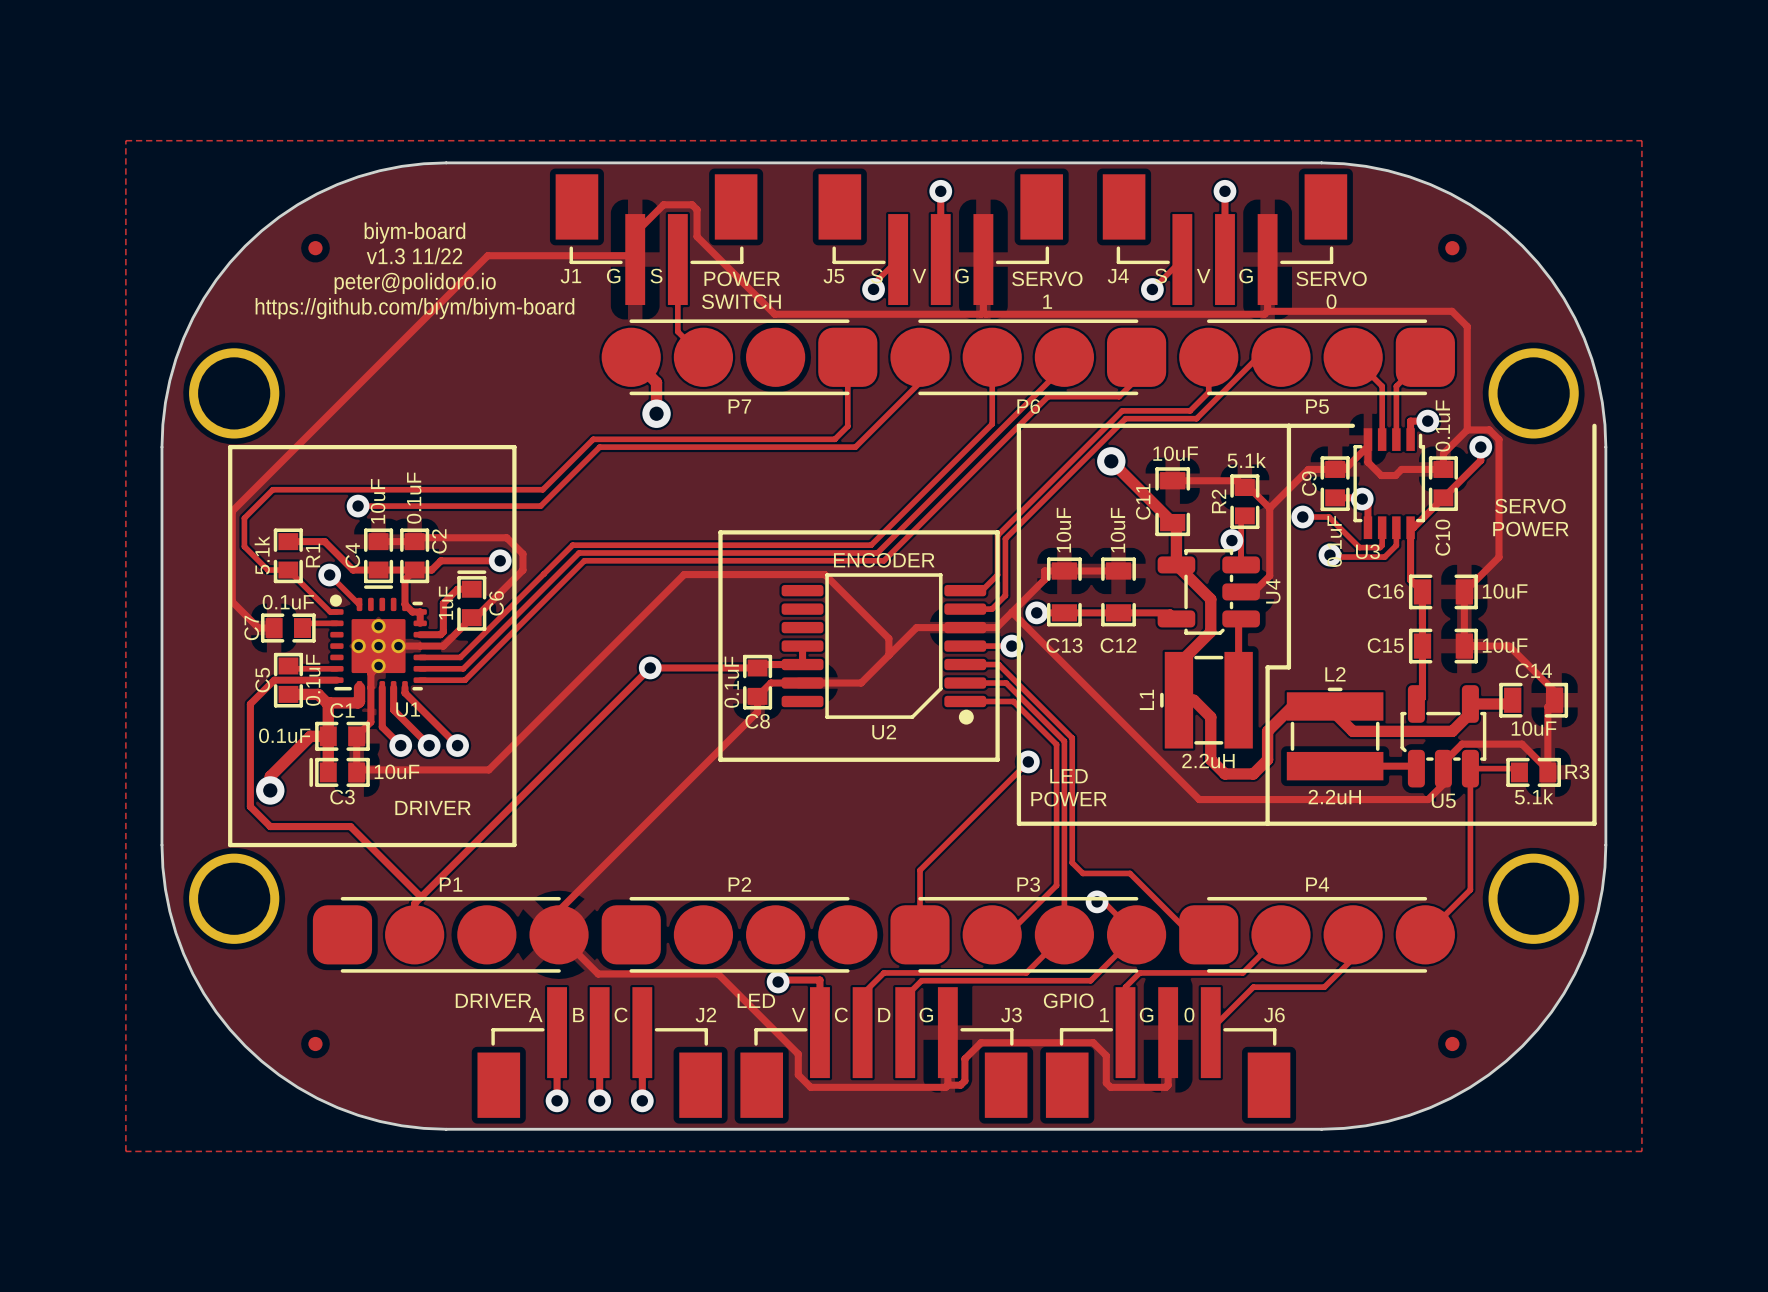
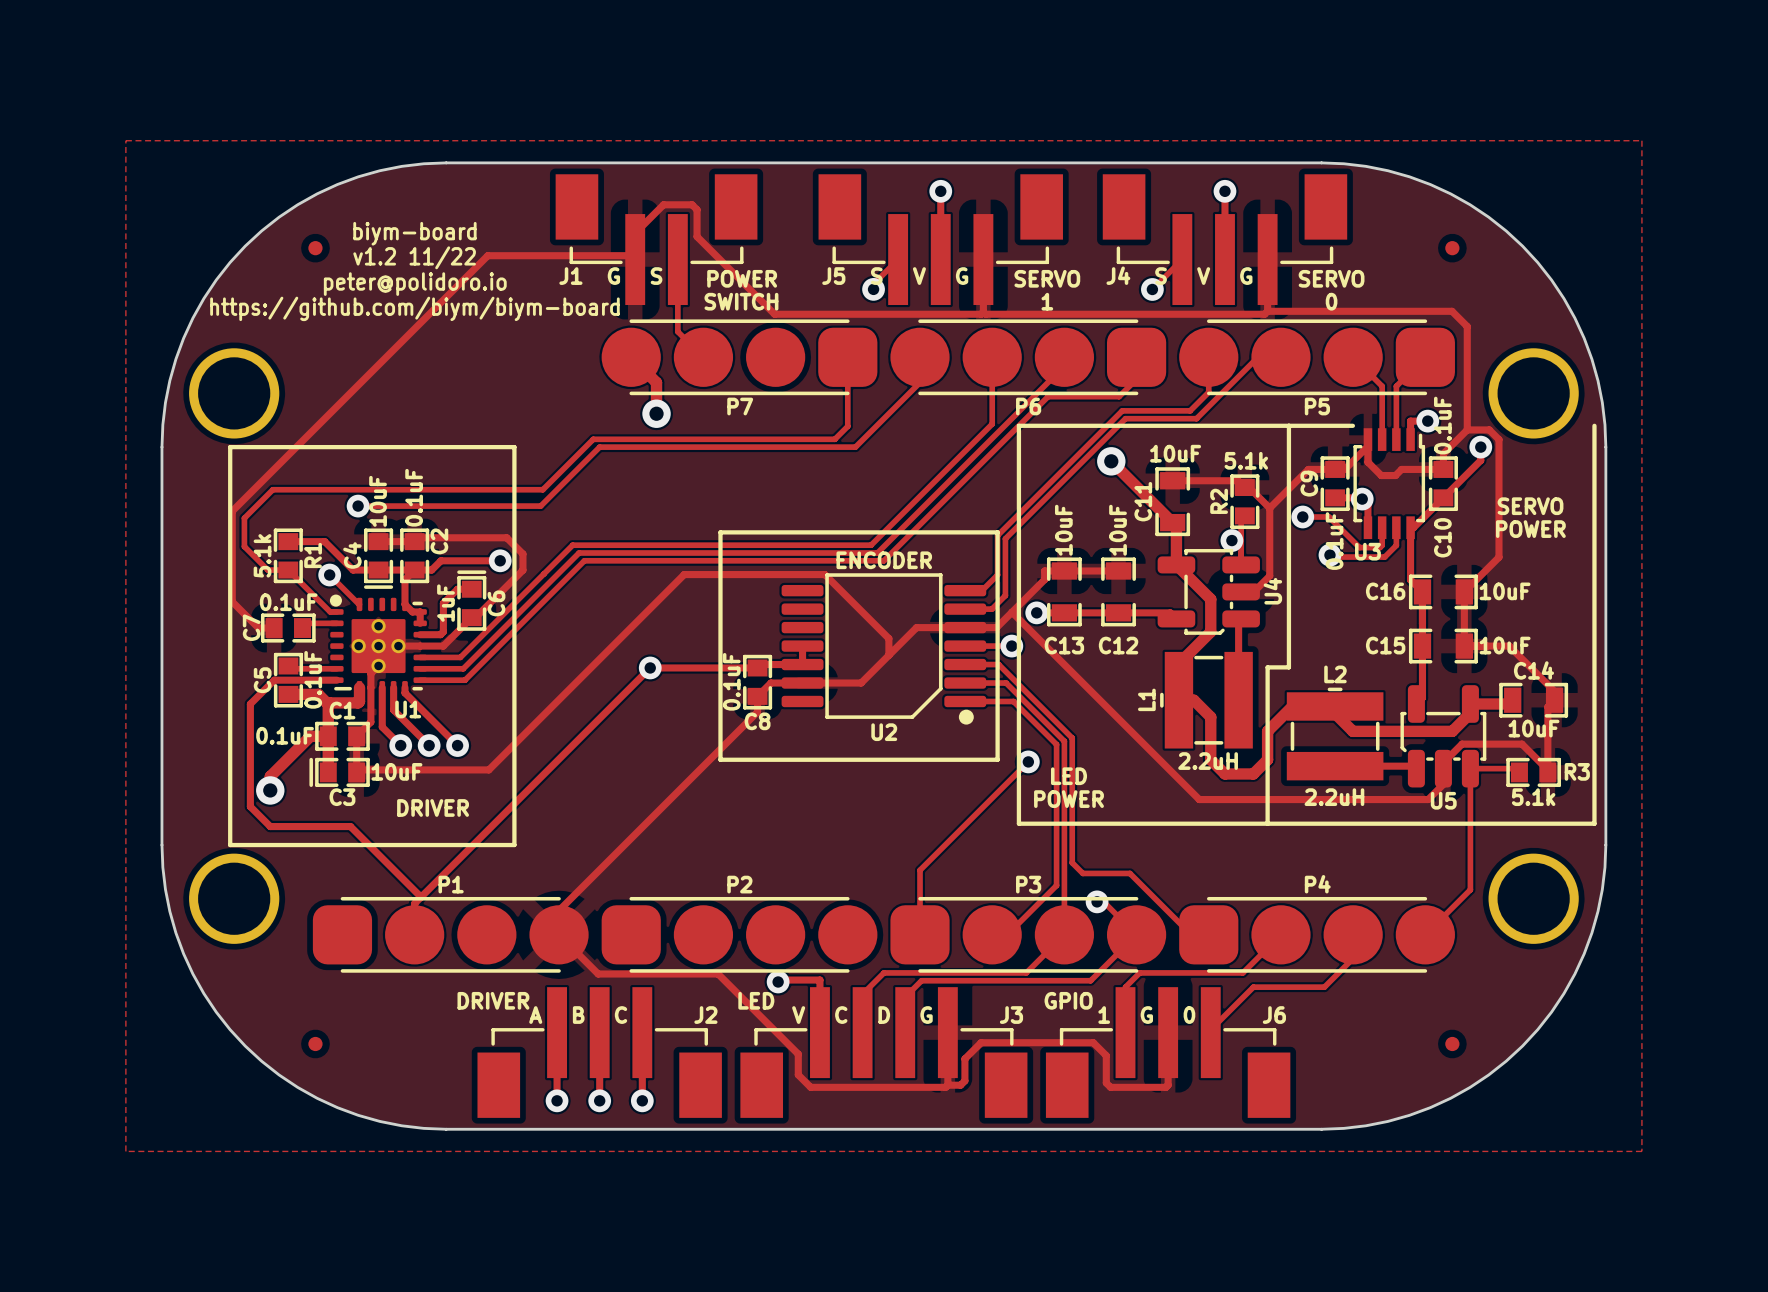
text: v1.3 11/22 (414, 256) -> v1.2 11/22 (414, 257)

